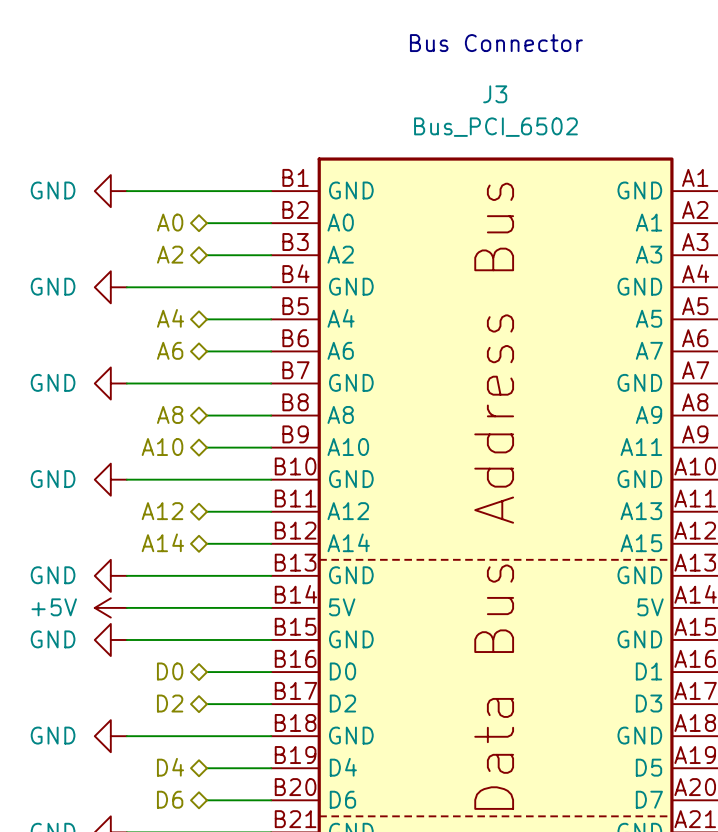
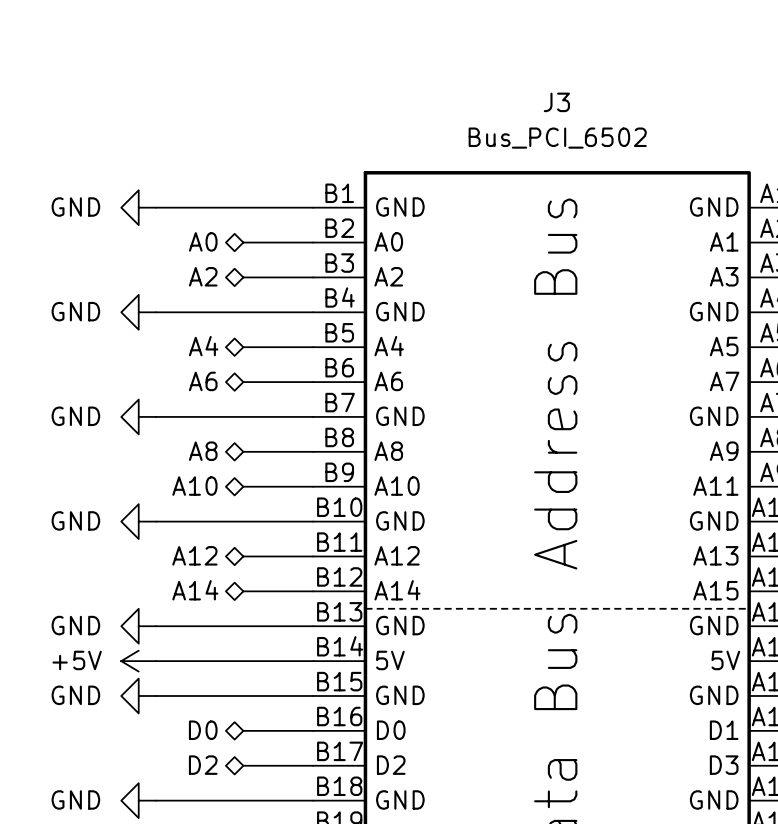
text: Bus Connector (496, 43) -> none

